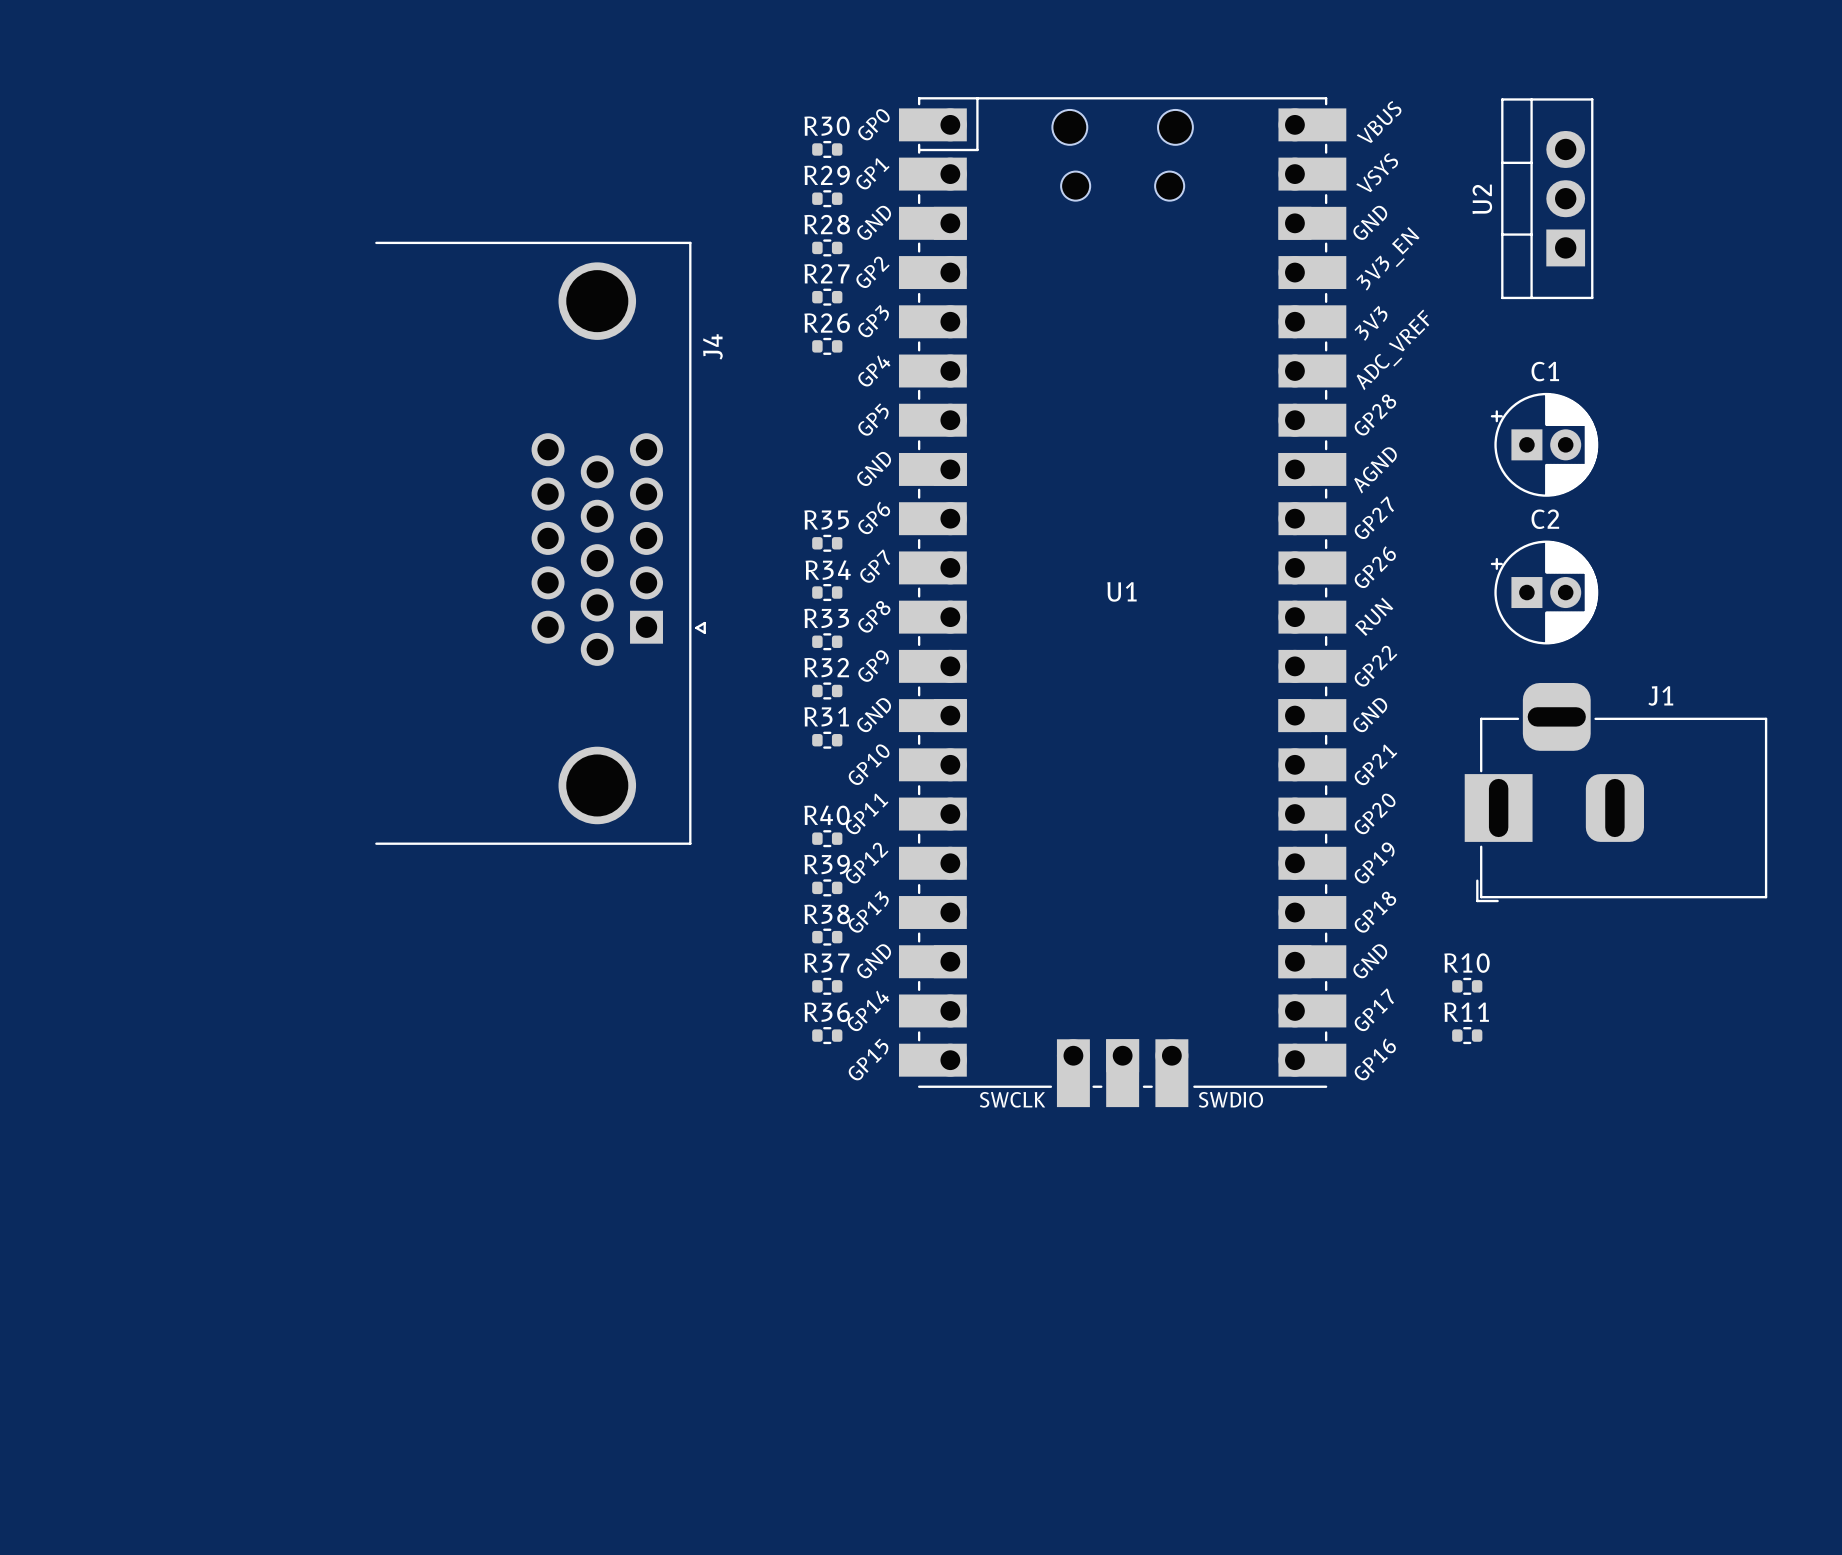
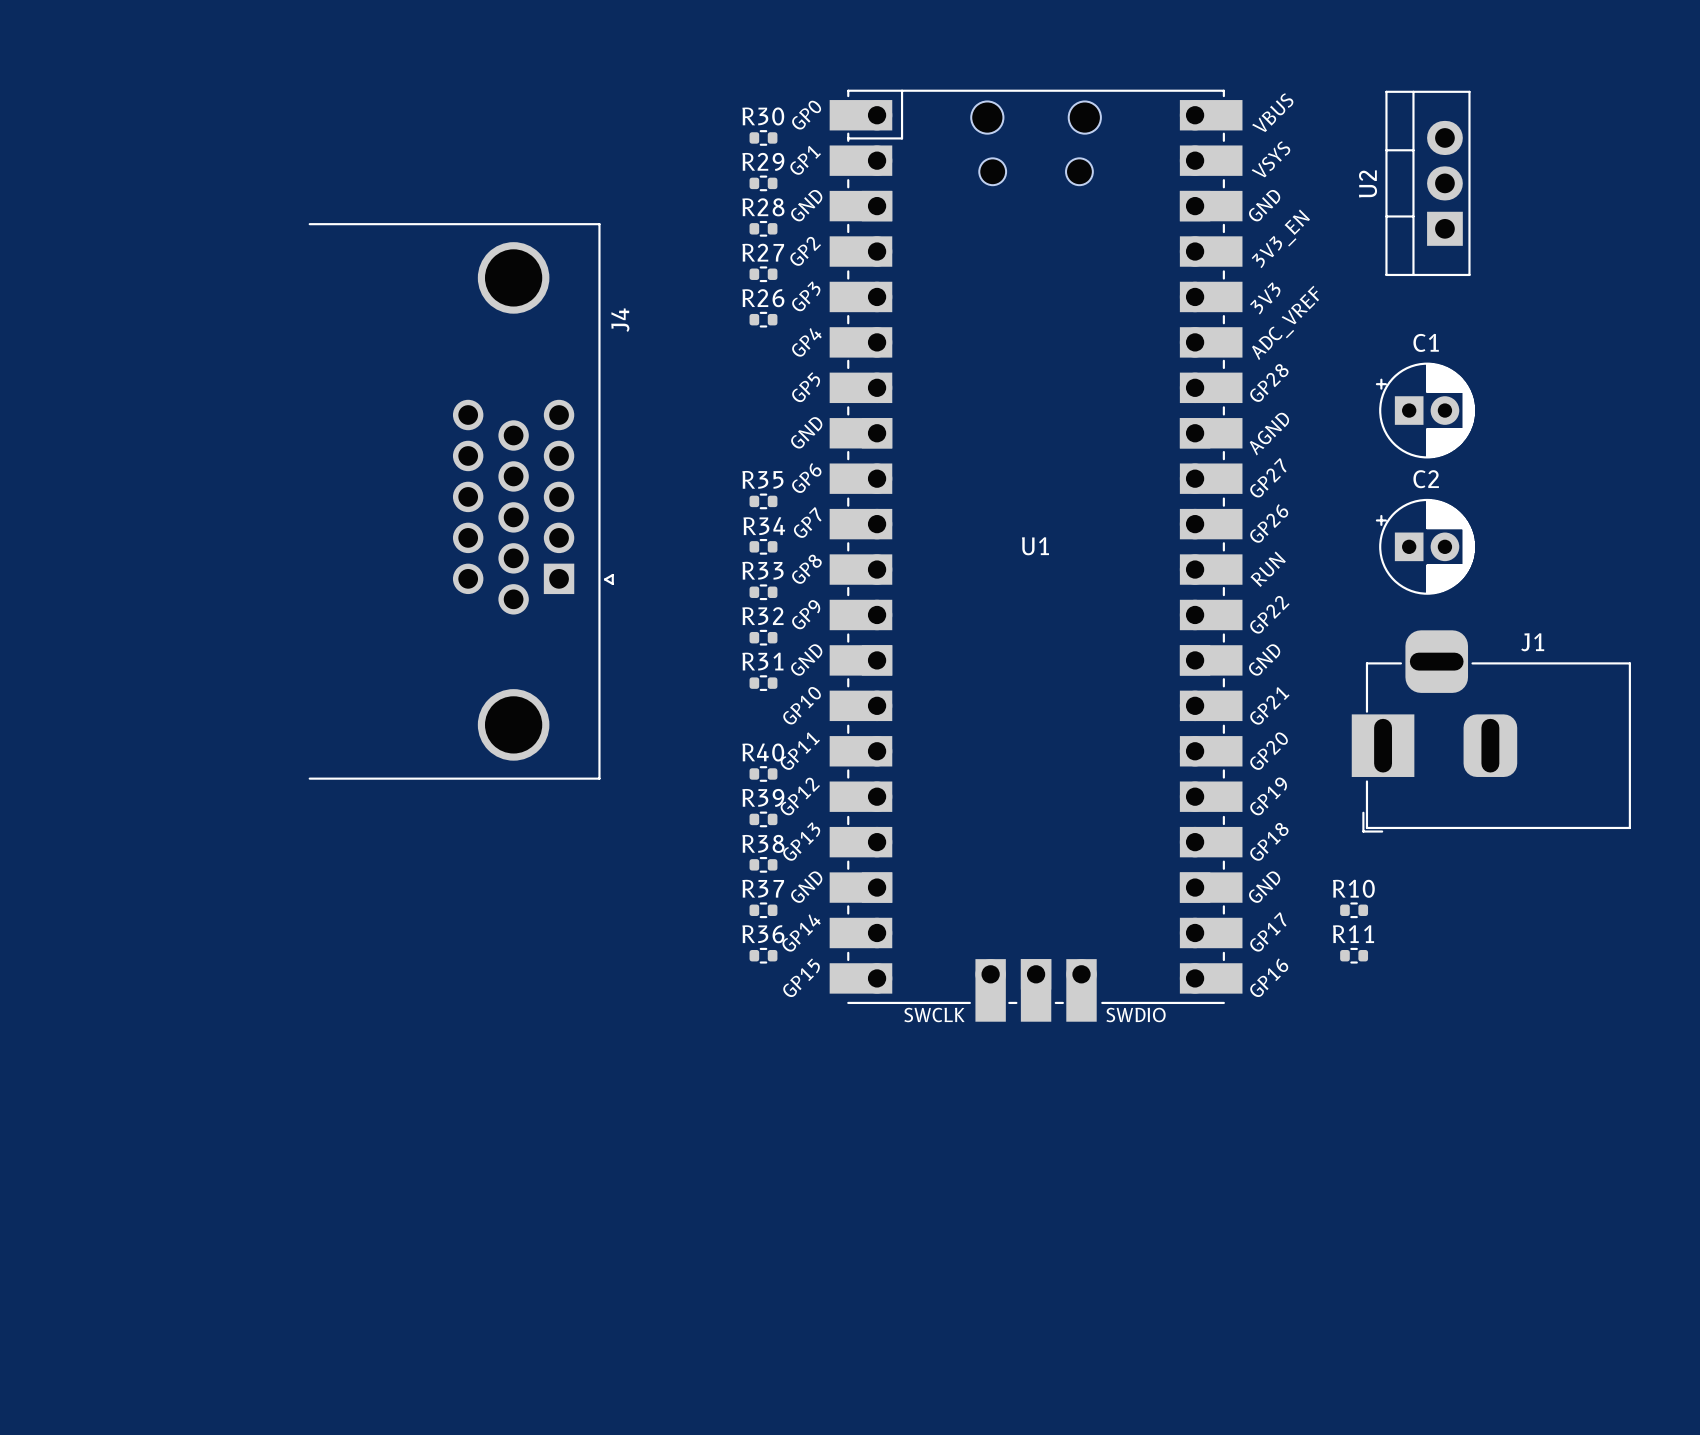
J4 position: (540, 543) -> (461, 501)

